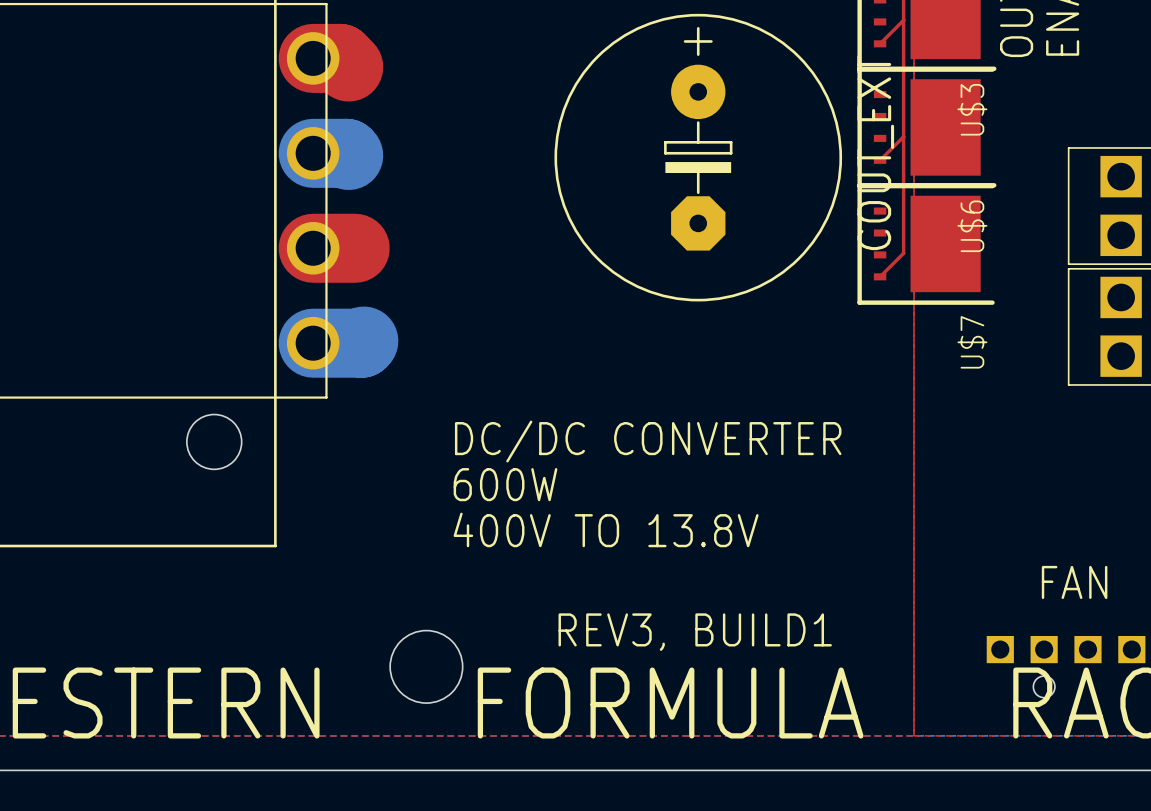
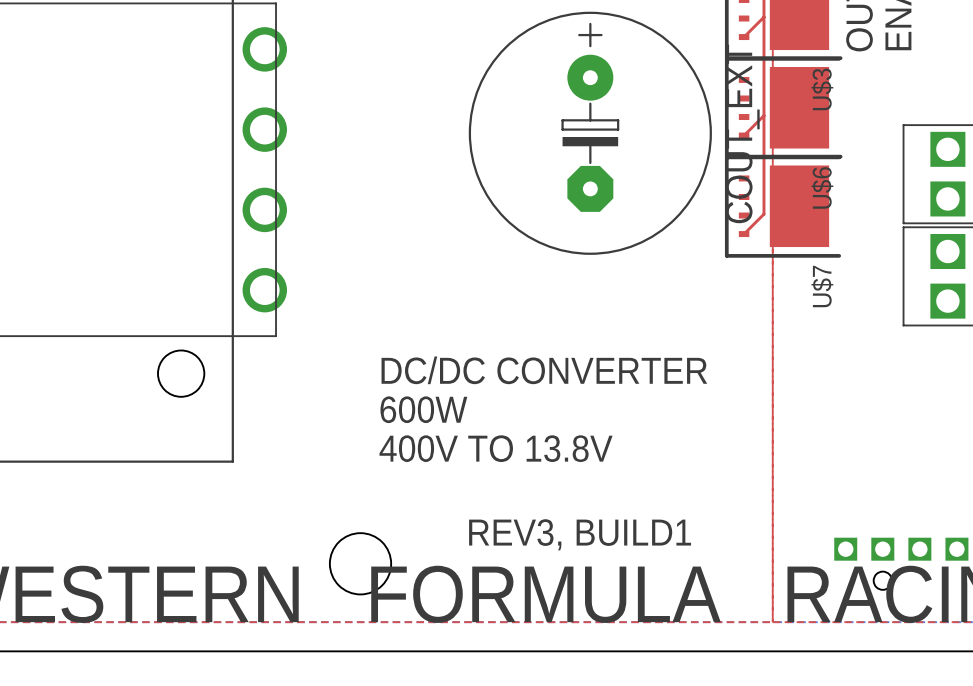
top track: (313, 58) (340, 58) (348, 67) -> none
bottom track: (313, 153) (346, 153) (348, 155) -> none
top track: (313, 248) (355, 248) -> none
bottom track: (363, 341) (361, 343) (313, 343) -> none
text: FAN (1074, 582) -> none

